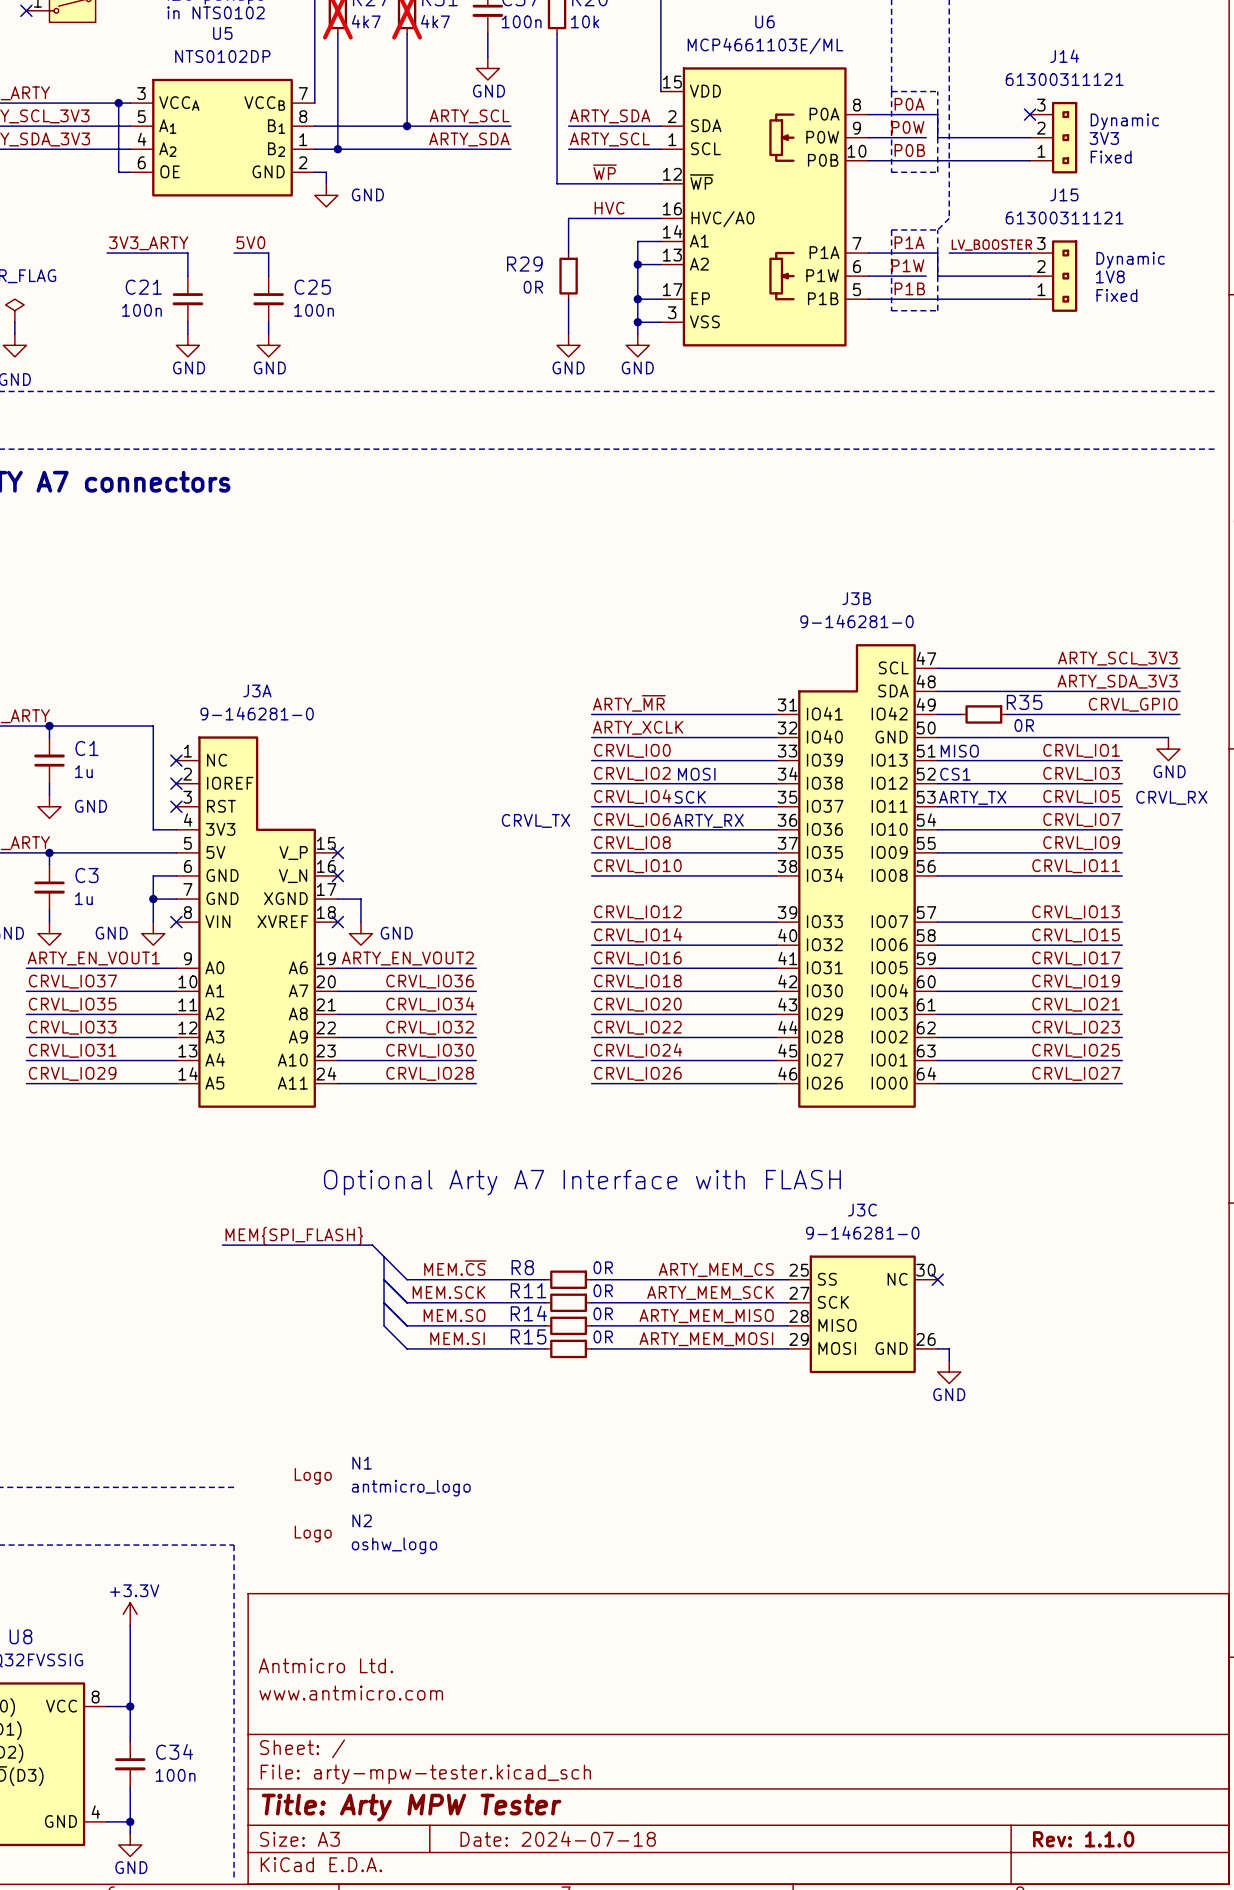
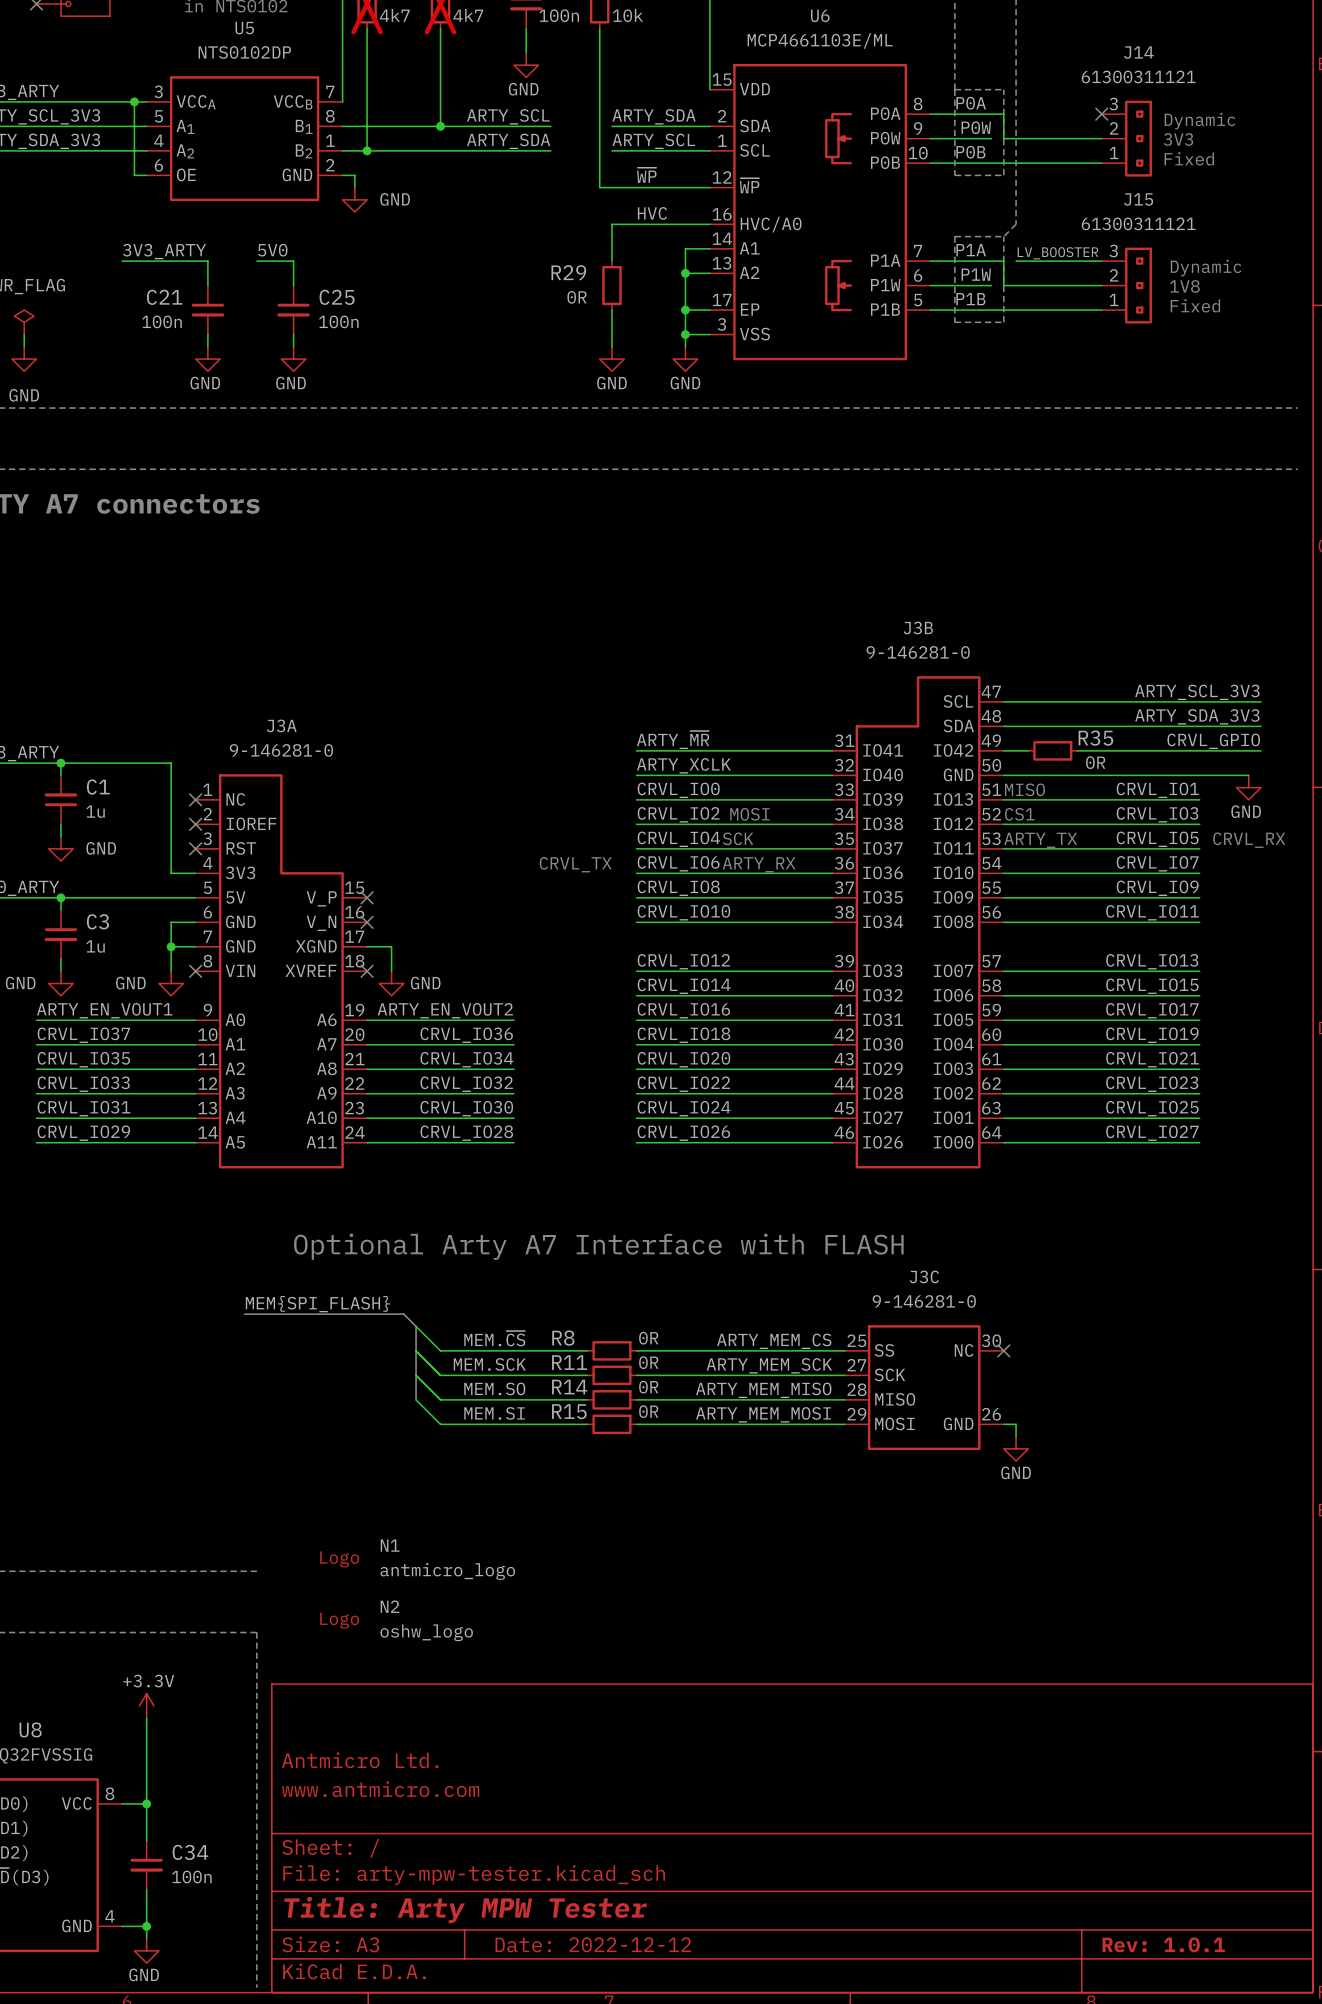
title block: Date: 2024-07-18 (558, 1838) -> Date: 2022-12-12 (593, 1944)
title block: Rev: 1.1.0 (1083, 1839) -> Rev: 1.0.1 (1163, 1944)

